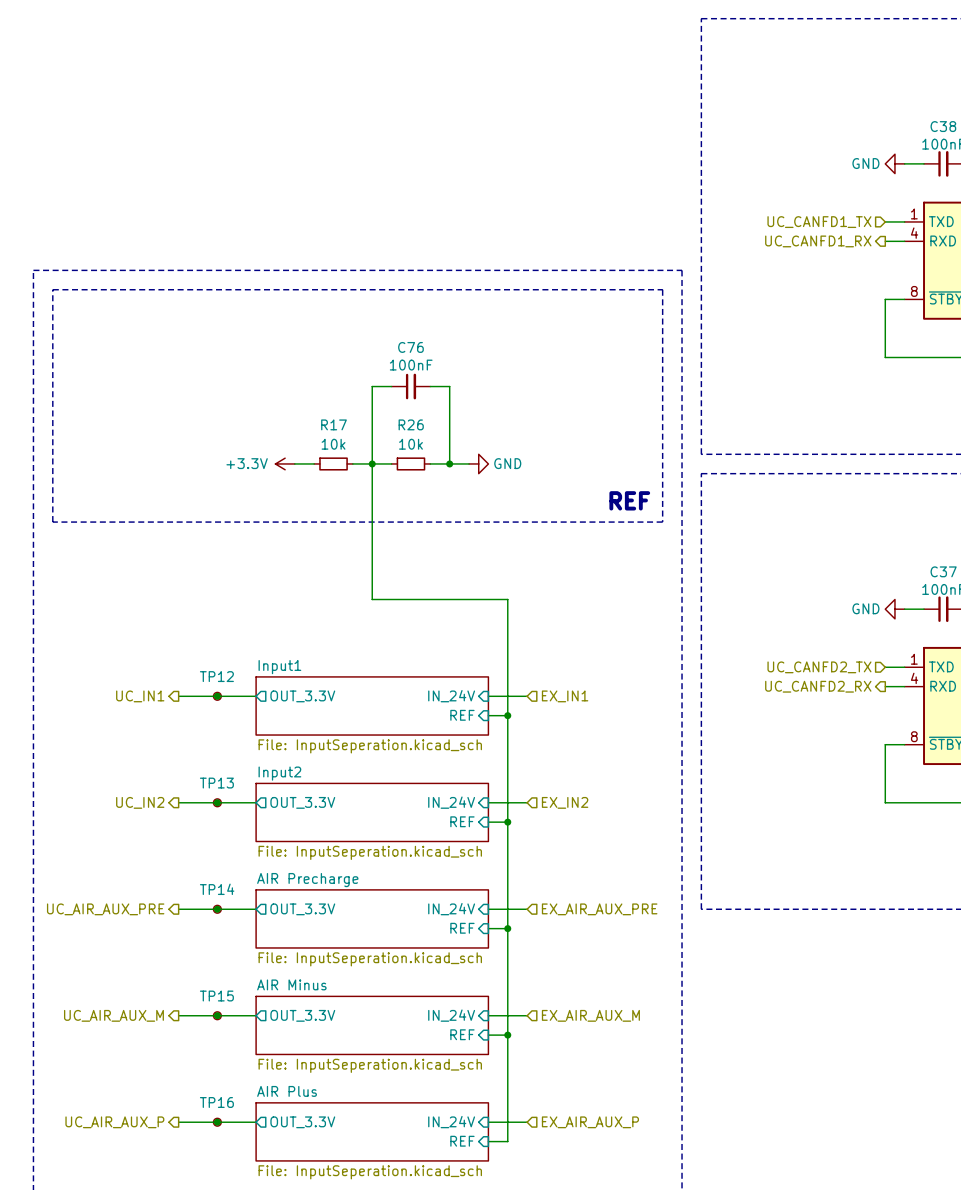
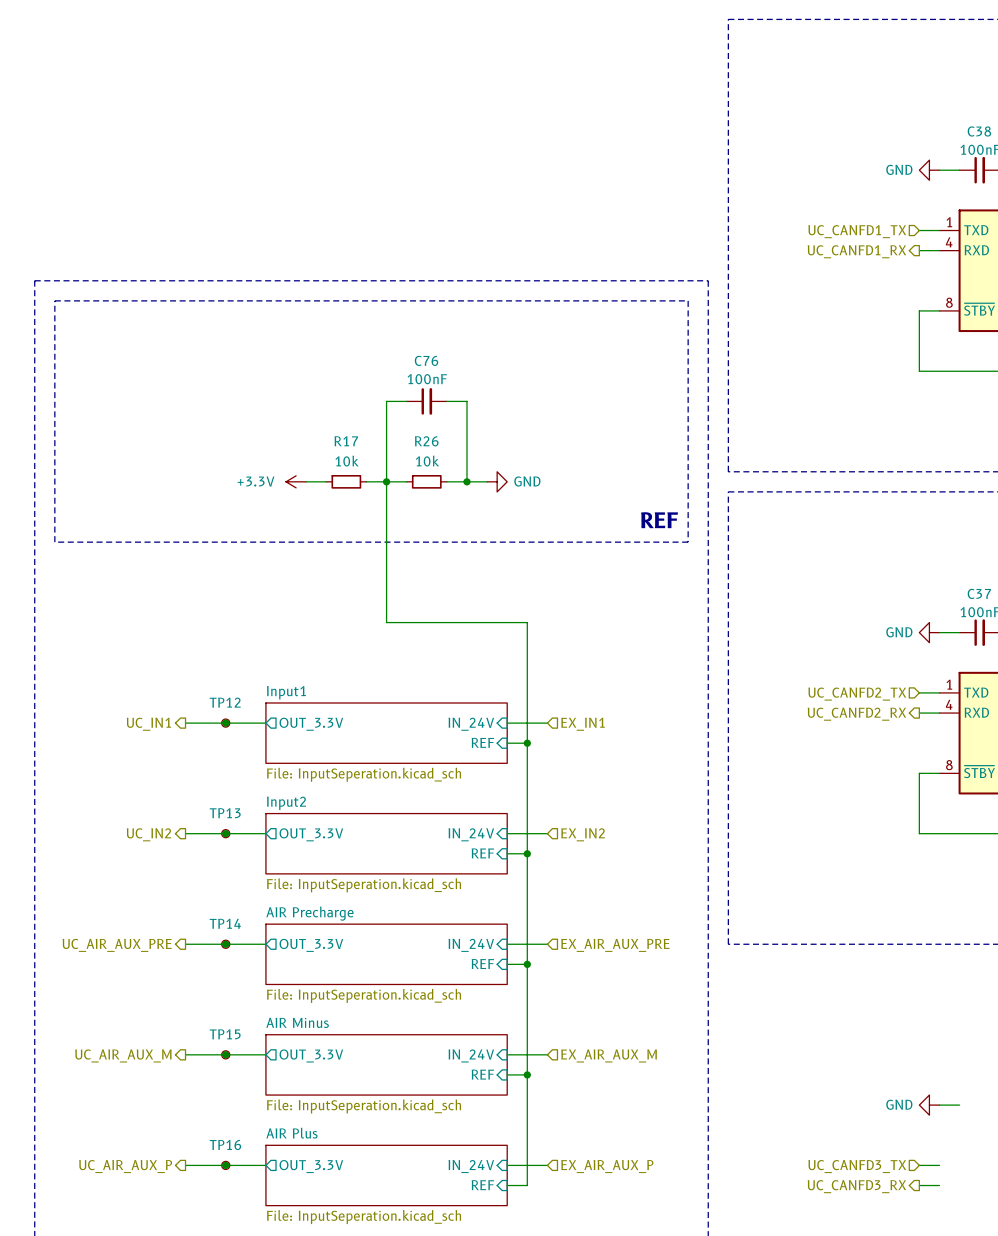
power symbol: none -> GND (929, 1105)
wire: none -> (939, 1105) (959, 1105)
hierarchical label: none -> UC_CANFD3_TX (857, 1166)
wire: none -> (919, 1165) (939, 1165)
hierarchical label: none -> UC_CANFD3_RX (856, 1186)
wire: none -> (919, 1185) (939, 1185)

